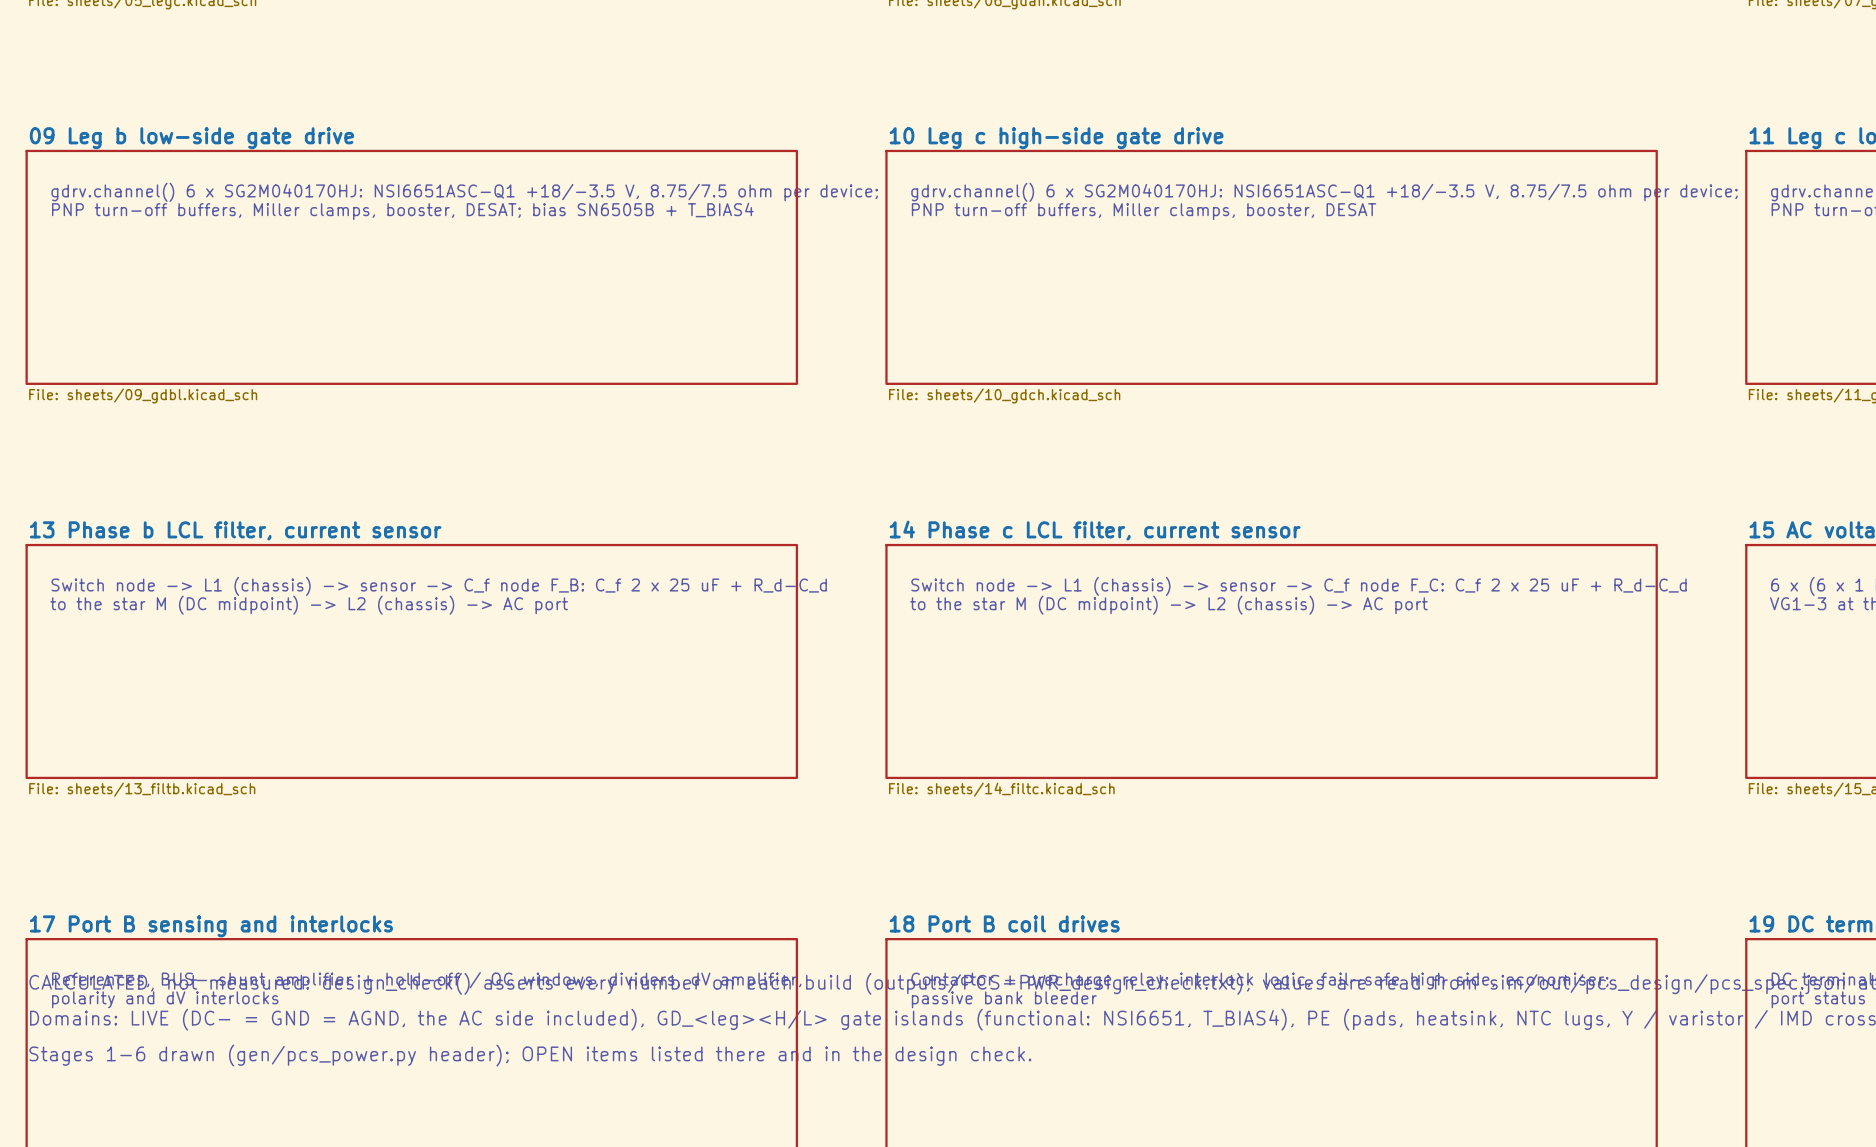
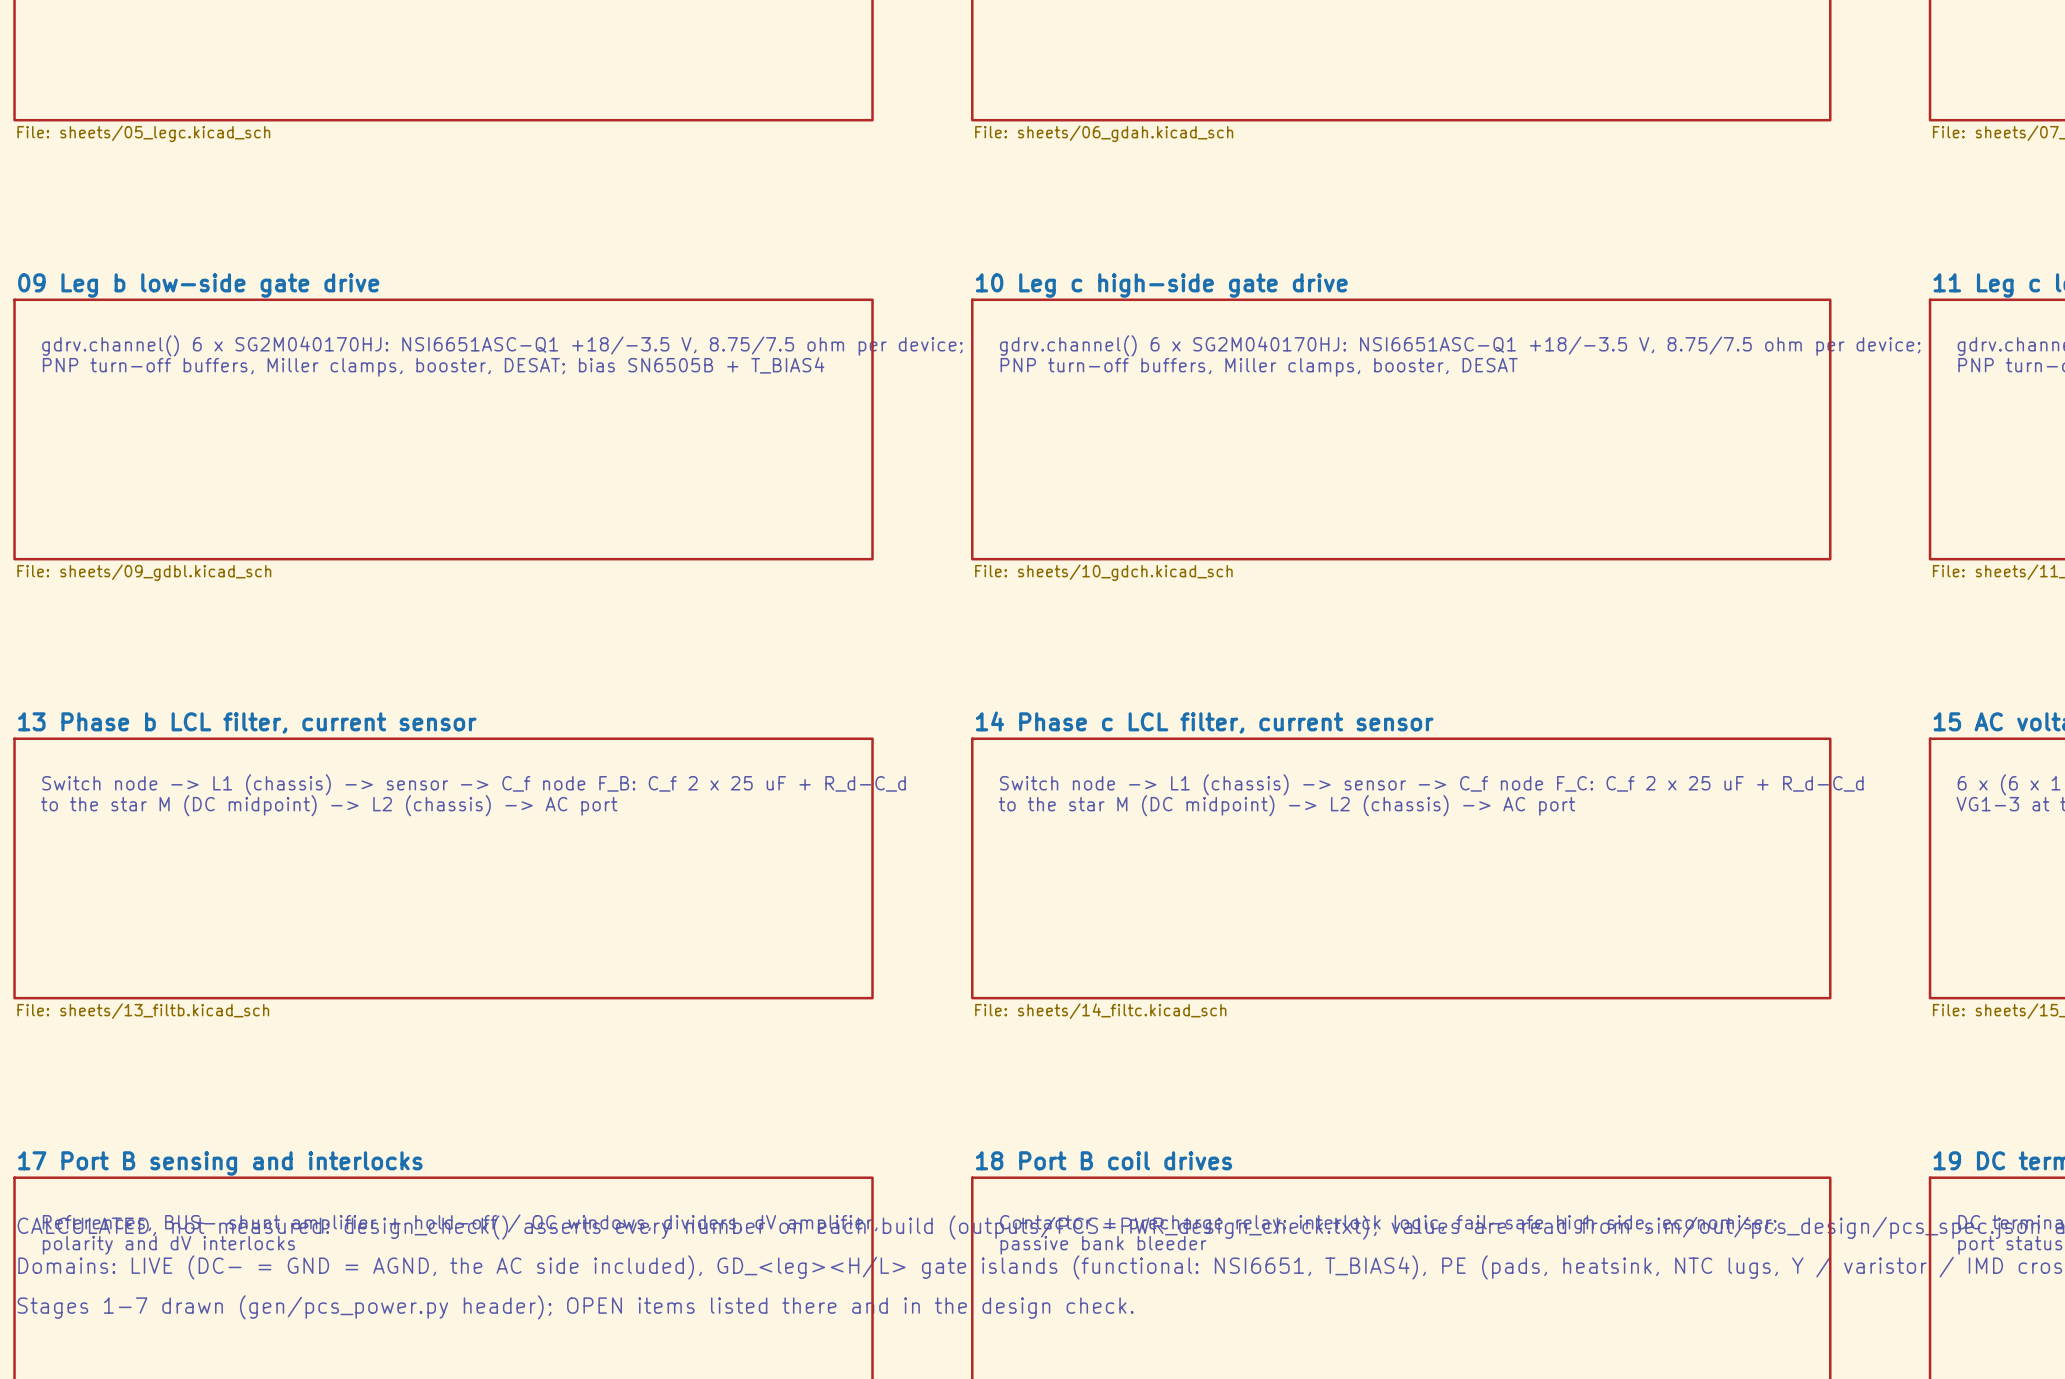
text: Stages 1-6 drawn (gen/pcs_power.py header); OPEN items listed there and in the design check. (530, 1055) -> Stages 1-7 drawn (gen/pcs_power.py header); OPEN items listed there and in the design check. (575, 1307)

